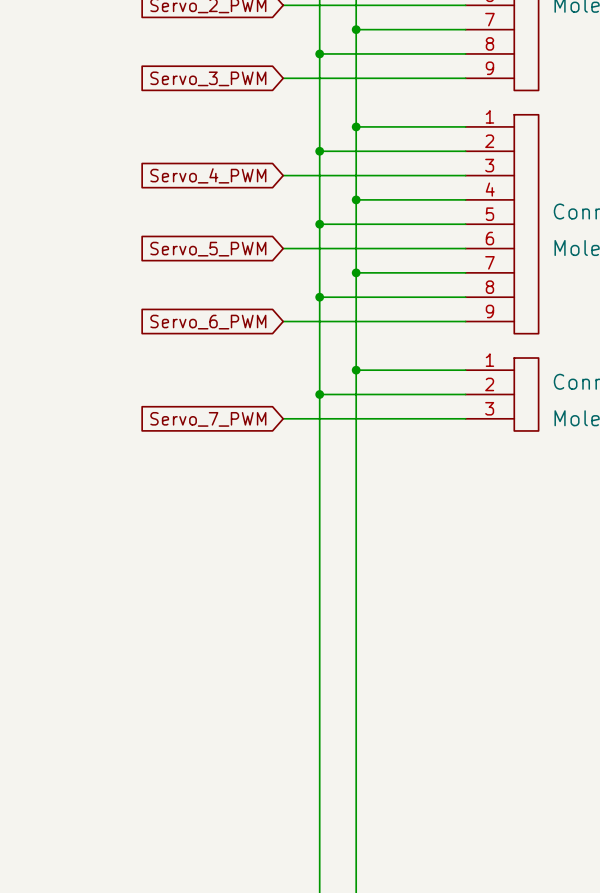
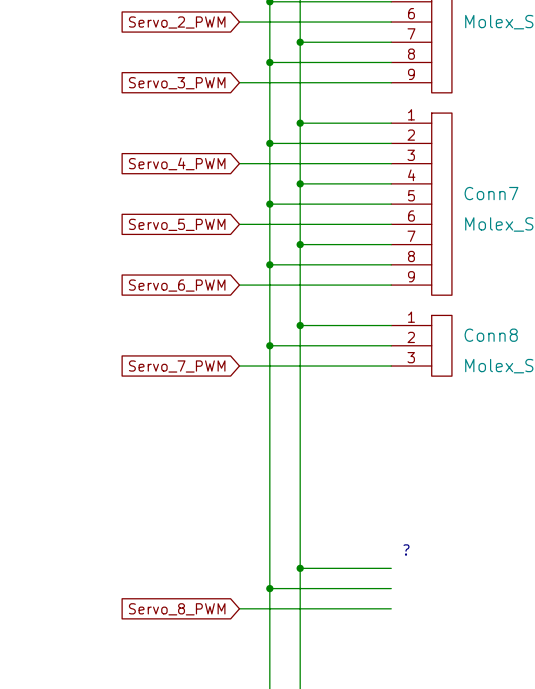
text: none -> ? (406, 549)
wire: none -> (300, 568) (391, 568)
junction: none -> (300, 568)
wire: none -> (269, 588) (391, 588)
junction: none -> (269, 588)
wire: none -> (239, 608) (391, 608)
global label: none -> Servo_8_PWM (177, 609)

